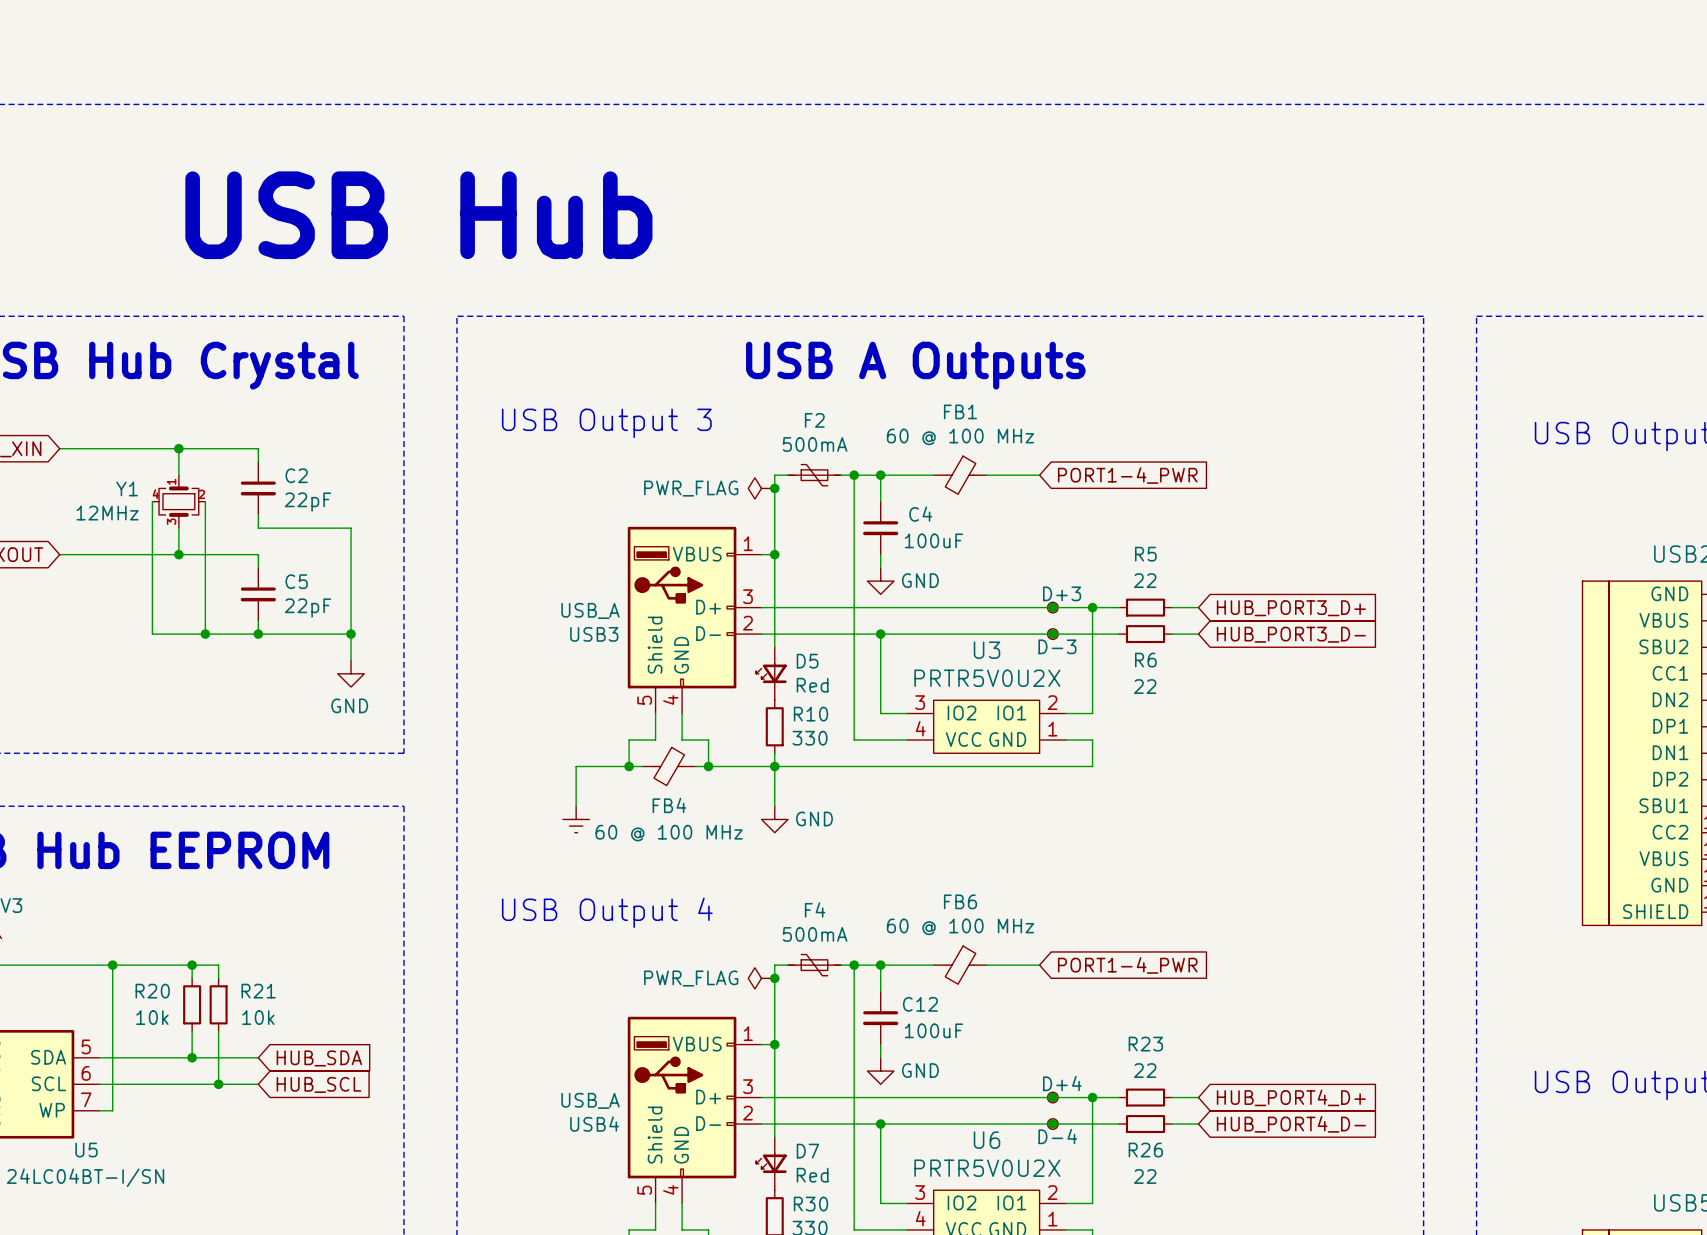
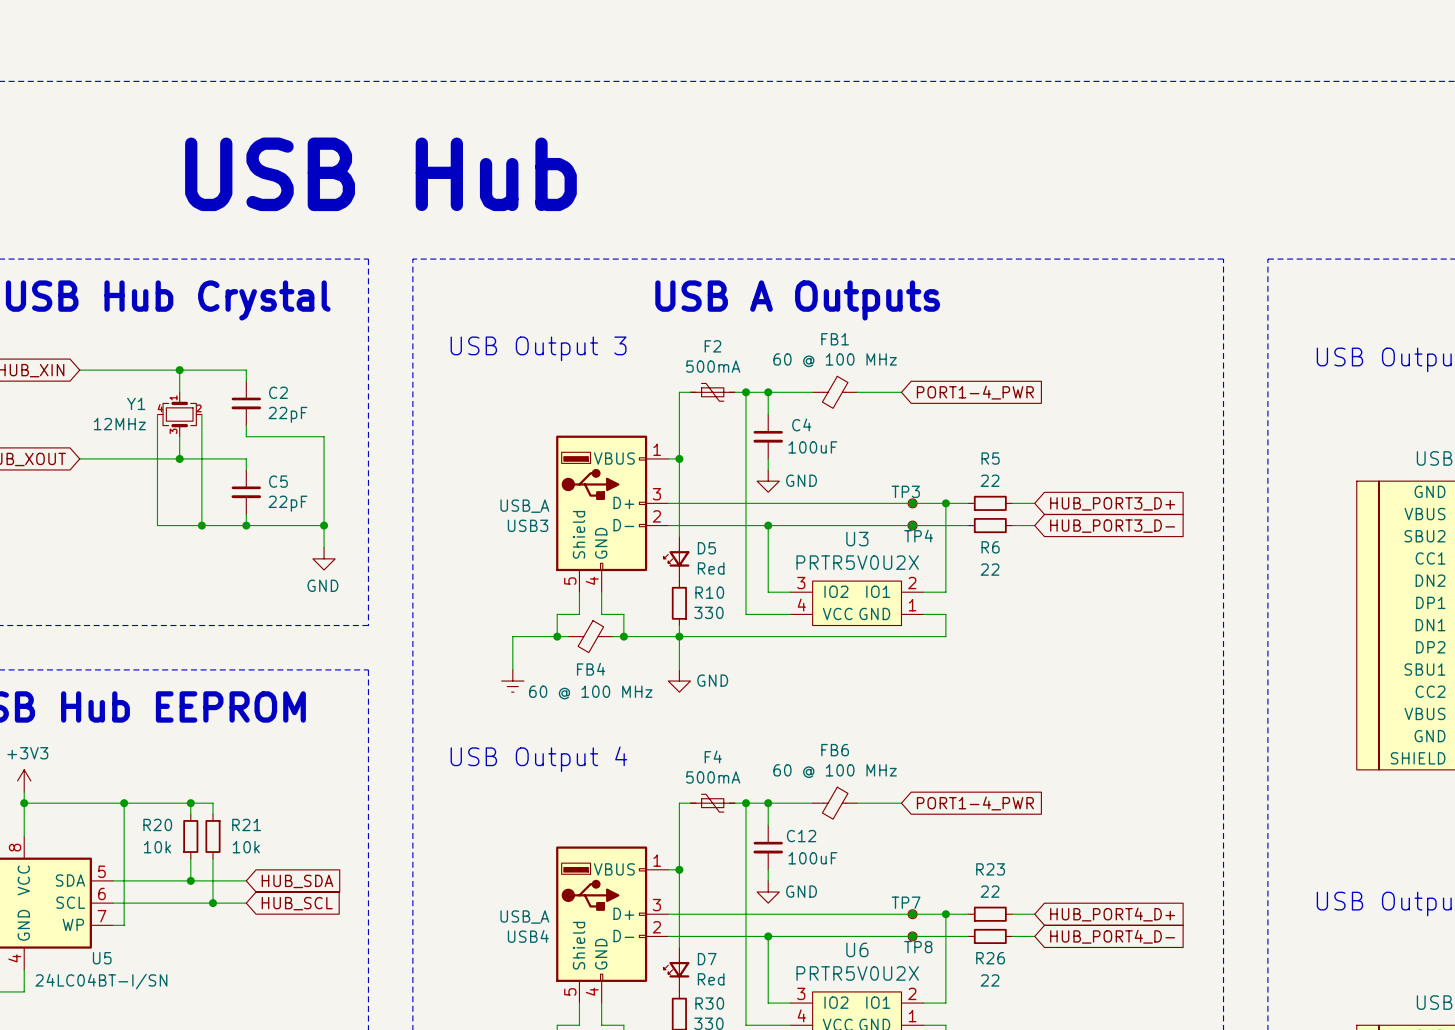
power symbol: PWR_FLAG (761, 488) -> none
junction: (774, 488) -> none
D+3 name: D+3 (1062, 593) -> TP3 (905, 491)
D-3 name: D-3 (1057, 646) -> TP4 (918, 535)
power symbol: PWR_FLAG (761, 978) -> none
junction: (774, 978) -> none
D+4 name: D+4 (1062, 1083) -> TP7 (906, 902)
D-4 name: D-4 (1057, 1136) -> TP8 (918, 947)

